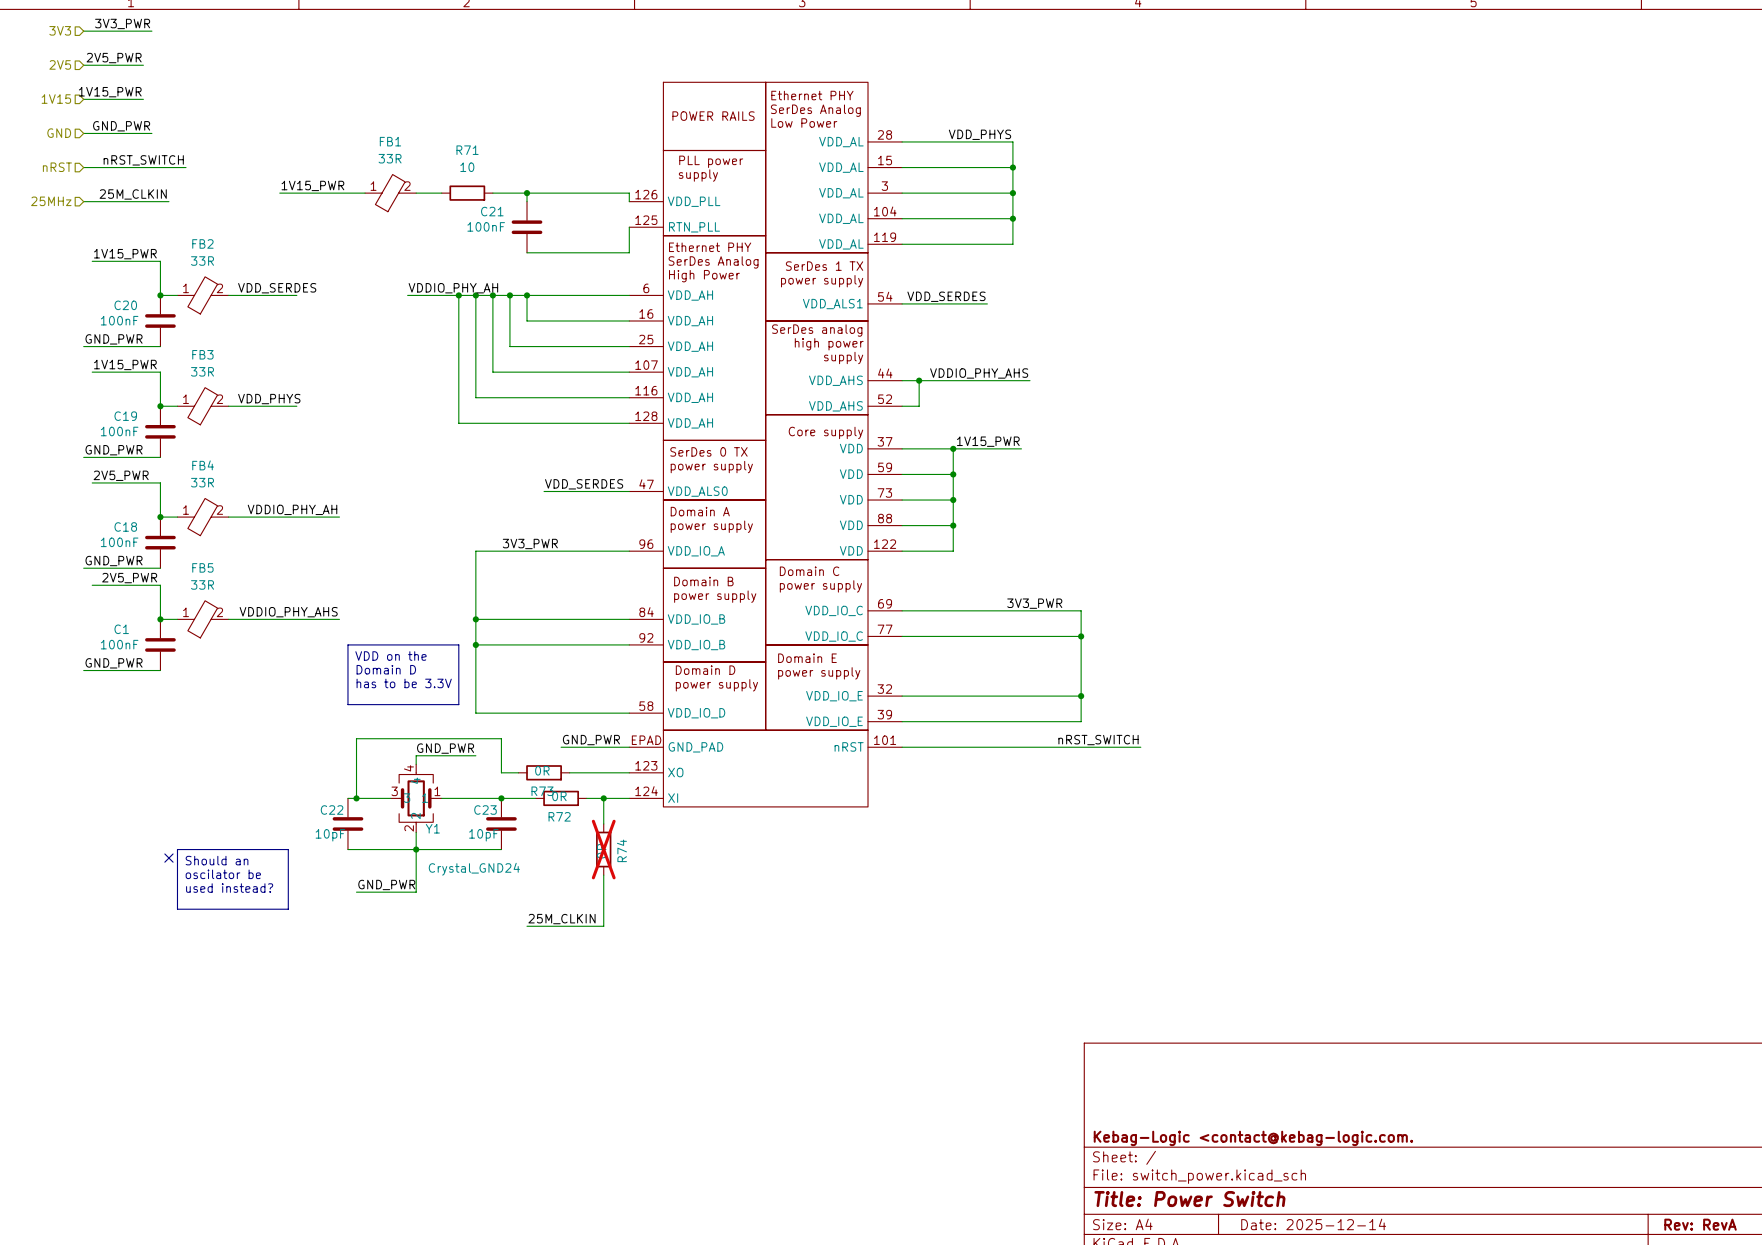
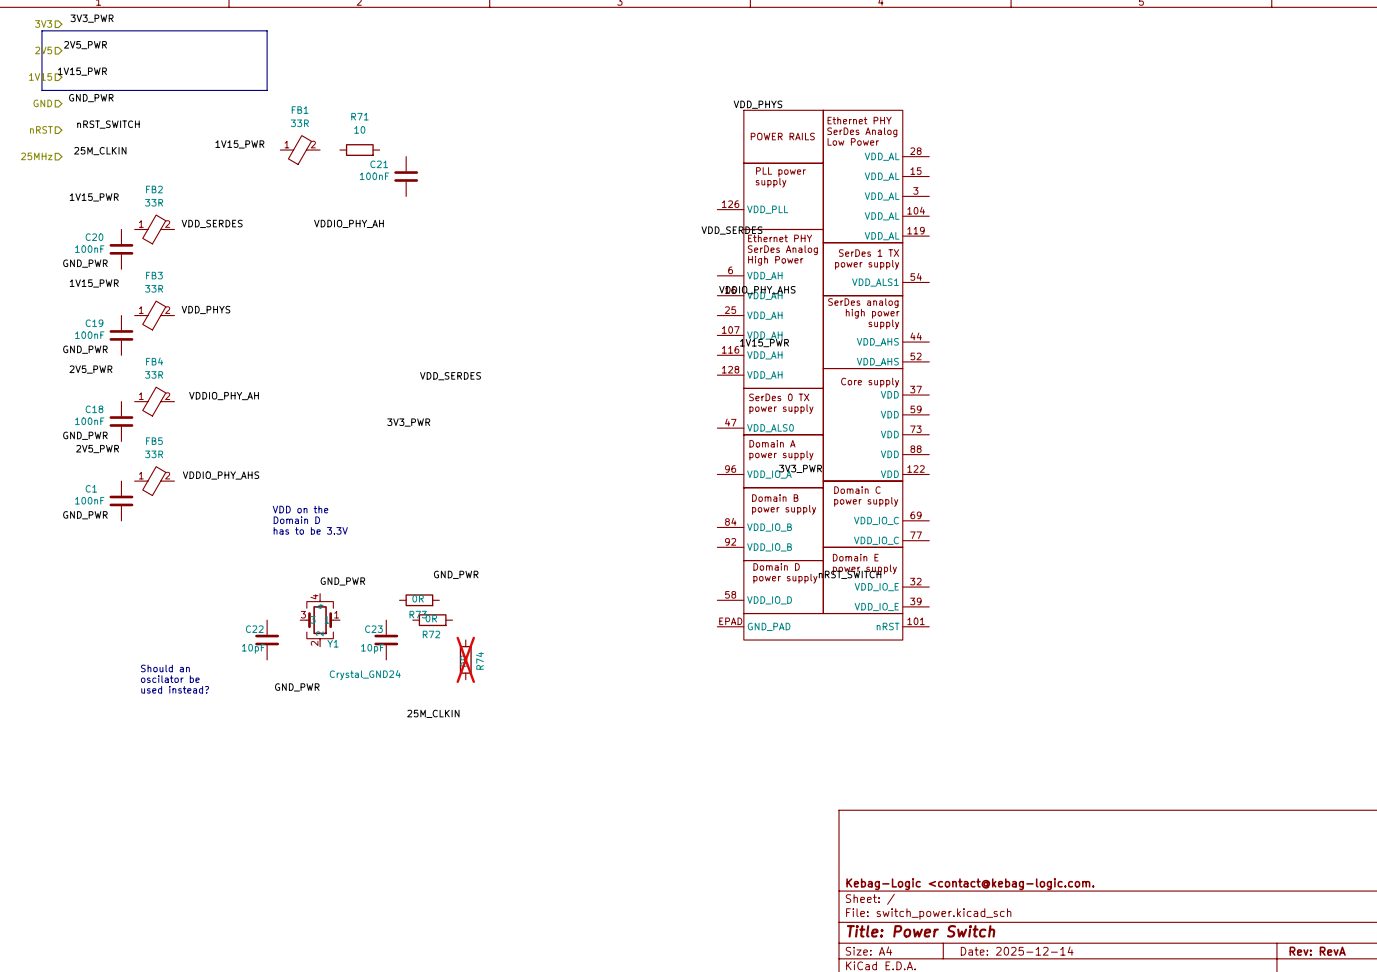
wire: (83, 31) (151, 31) -> none
line: none -> (41, 30) (267, 30) (267, 90) (41, 90) (41, 30)
wire: (83, 65) (143, 65) -> none
wire: (83, 99) (143, 99) -> none
wire: (83, 133) (151, 133) -> none
wire: (902, 141) (1012, 141) (1012, 244) (902, 244) -> none
wire: (83, 167) (186, 167) -> none
wire: (902, 167) (1012, 167) -> none
junction: (1012, 167) -> none
wire: (279, 193) (365, 193) -> none
wire: (416, 193) (441, 193) -> none
wire: (492, 193) (629, 193) (629, 201) -> none
wire: (527, 193) (527, 201) -> none
junction: (527, 193) -> none
wire: (902, 193) (1012, 193) -> none
junction: (1012, 193) -> none
wire: (83, 201) (168, 201) -> none
wire: (902, 218) (1012, 218) -> none
junction: (1012, 218) -> none
wire: (629, 227) (629, 252) (527, 252) -> none
wire: (92, 261) (160, 261) (160, 295) (177, 295) -> none
junction: (160, 295) -> none
wire: (228, 295) (296, 295) -> none
wire: (407, 295) (629, 295) -> none
wire: (458, 295) (458, 423) (629, 423) -> none
junction: (458, 295) -> none
wire: (475, 295) (475, 397) (629, 397) -> none
junction: (475, 295) -> none
wire: (492, 295) (492, 372) (629, 372) -> none
junction: (492, 295) -> none
wire: (509, 295) (509, 346) (629, 346) -> none
junction: (509, 295) -> none
wire: (527, 295) (527, 321) (629, 321) -> none
junction: (527, 295) -> none
wire: (902, 303) (987, 303) -> none
wire: (83, 346) (160, 346) -> none
wire: (92, 372) (160, 372) (160, 406) (177, 406) -> none
wire: (902, 380) (1029, 380) -> none
wire: (919, 380) (919, 406) (902, 406) -> none
junction: (919, 380) -> none
junction: (160, 406) -> none
wire: (228, 406) (296, 406) -> none
part: (765, 444) -> none
wire: (902, 448) (1021, 448) -> none
wire: (953, 448) (953, 551) (902, 551) -> none
junction: (953, 448) -> none
wire: (83, 457) (160, 457) -> none
wire: (902, 474) (953, 474) -> none
junction: (953, 474) -> none
wire: (92, 482) (160, 482) (160, 517) (177, 517) -> none
part: none -> (823, 375)
wire: (544, 491) (629, 491) -> none
wire: (902, 500) (953, 500) -> none
junction: (953, 500) -> none
junction: (160, 517) -> none
wire: (228, 517) (339, 517) -> none
wire: (902, 525) (953, 525) -> none
junction: (953, 525) -> none
wire: (629, 551) (475, 551) (475, 713) (629, 713) -> none
wire: (83, 568) (160, 568) -> none
wire: (92, 585) (160, 585) (160, 619) (177, 619) -> none
wire: (902, 610) (1081, 610) (1081, 721) (902, 721) -> none
junction: (160, 619) -> none
wire: (228, 619) (339, 619) -> none
wire: (475, 619) (629, 619) -> none
junction: (475, 619) -> none
wire: (902, 636) (1081, 636) -> none
junction: (1081, 636) -> none
line: (347, 644) (458, 644) (458, 704) (347, 704) (347, 644) -> none
wire: (475, 644) (629, 644) -> none
junction: (475, 644) -> none
wire: (83, 670) (160, 670) -> none
wire: (902, 696) (1081, 696) -> none
junction: (1081, 696) -> none
wire: (561, 747) (629, 747) -> none
wire: (902, 747) (1140, 747) -> none
wire: (475, 755) (416, 755) (416, 764) -> none
wire: (518, 772) (501, 772) (501, 738) (356, 738) (356, 798) -> none
wire: (569, 772) (629, 772) -> none
wire: (347, 798) (390, 798) -> none
junction: (356, 798) -> none
wire: (441, 798) (535, 798) -> none
junction: (501, 798) -> none
wire: (586, 798) (629, 798) -> none
wire: (603, 798) (603, 823) -> none
junction: (603, 798) -> none
wire: (416, 832) (416, 892) (356, 892) -> none
line: (177, 849) (288, 849) (288, 909) (177, 909) (177, 849) -> none
wire: (347, 849) (501, 849) -> none
junction: (416, 849) -> none
no-connect mark: (168, 858) -> none
wire: (603, 875) (603, 926) (527, 926) -> none

